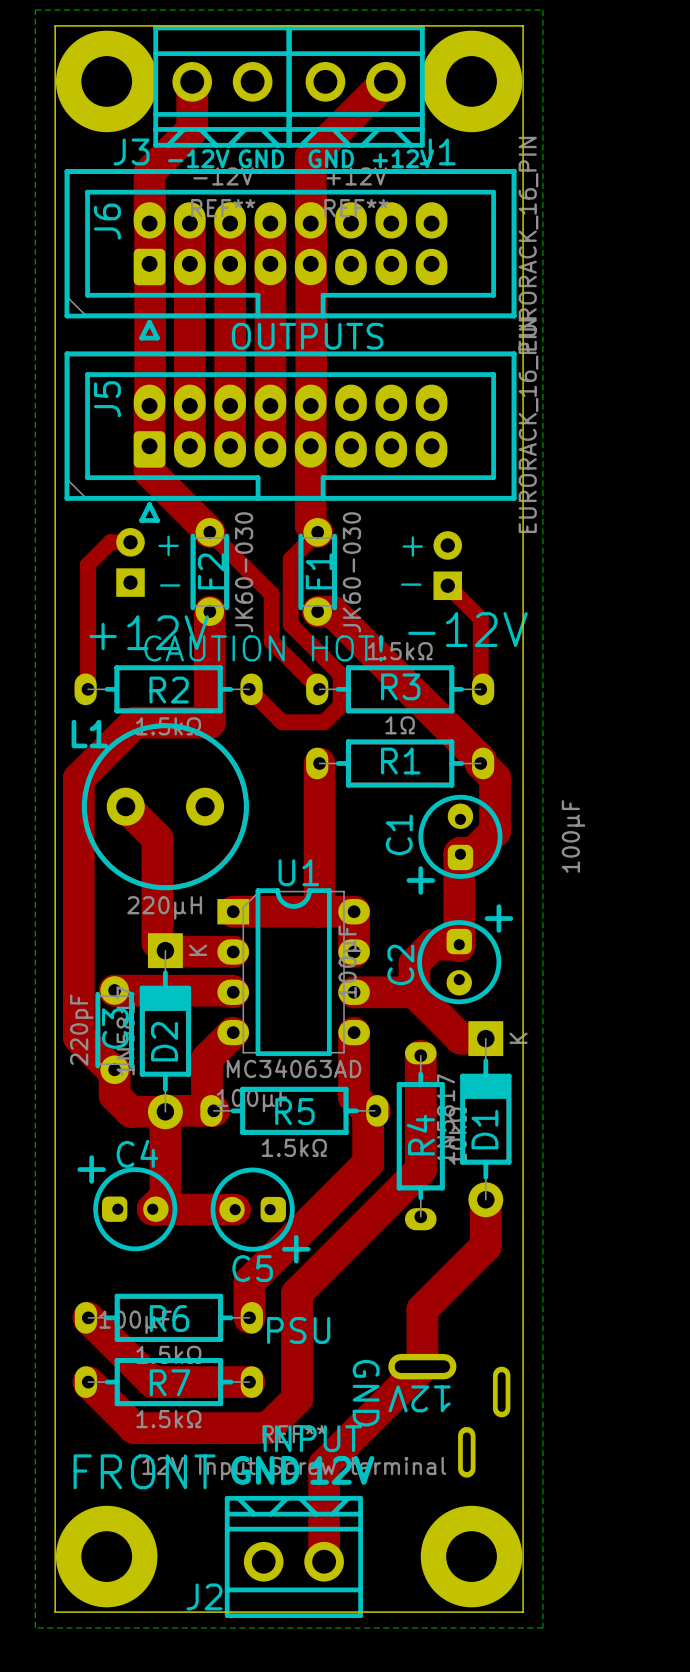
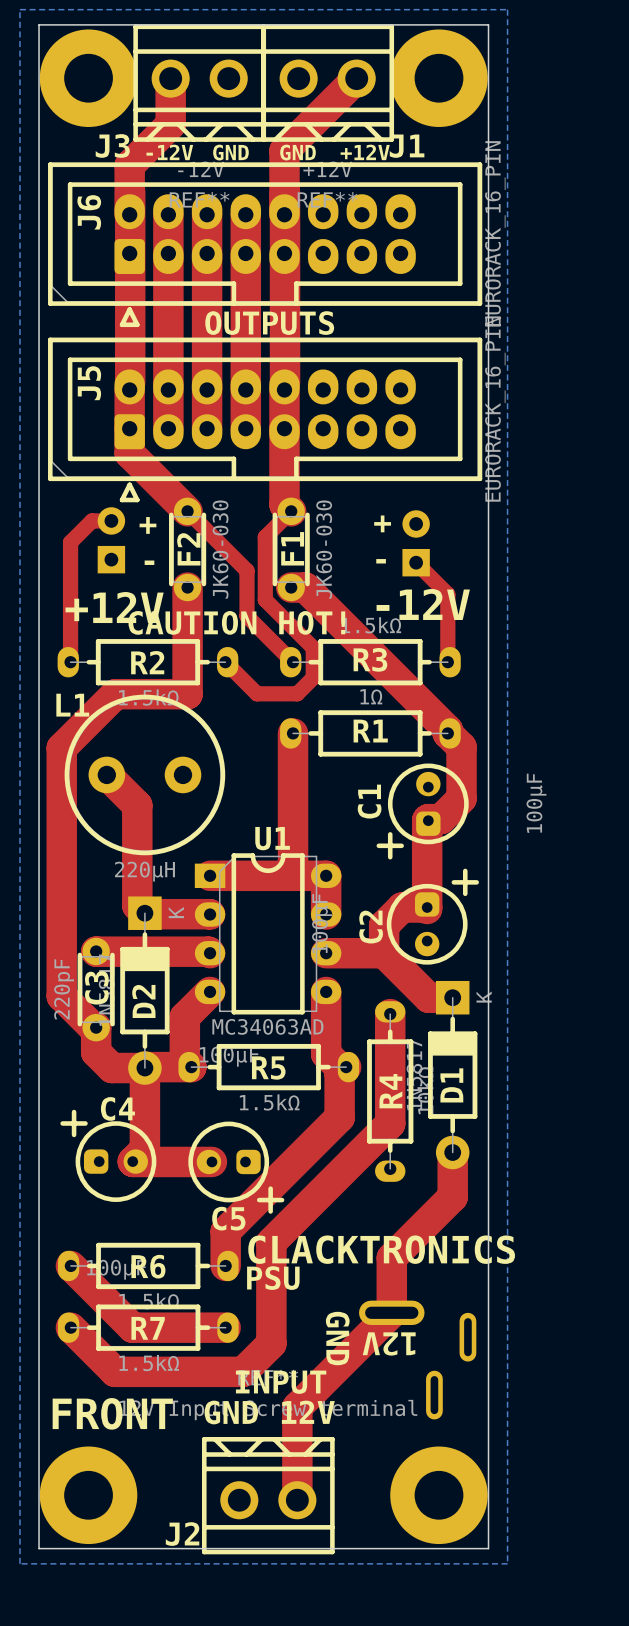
text: none -> CLACKTRONICS (381, 1249)

